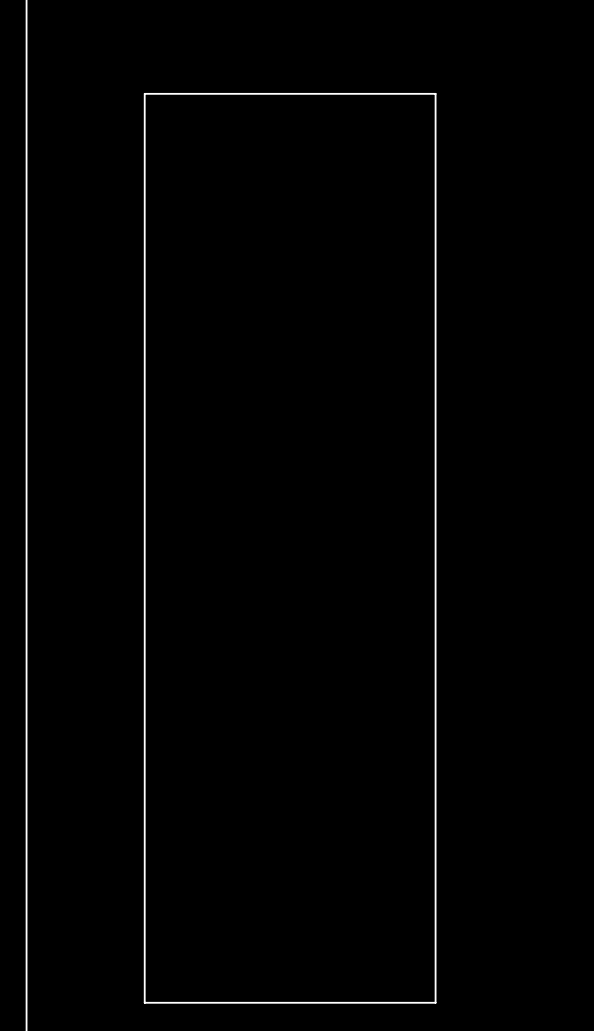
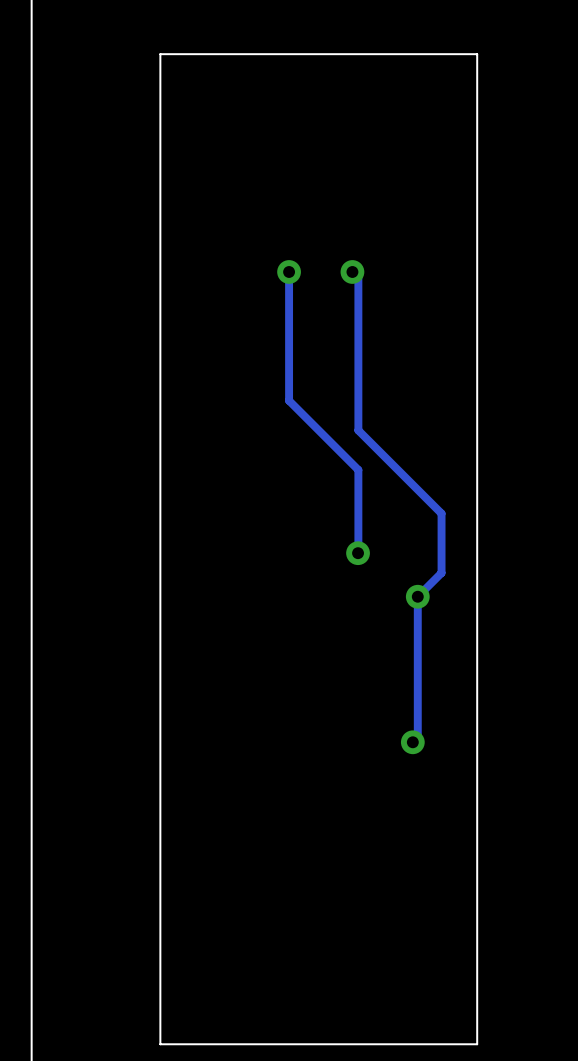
track: none -> (289, 271) (289, 400) (358, 470) (358, 552)
via: none -> (289, 271)
via: none -> (352, 271)
track: none -> (358, 271) (358, 430) (441, 513) (441, 572) (417, 596) (417, 737) (412, 742)
via: none -> (358, 553)
via: none -> (417, 596)
via: none -> (412, 742)

